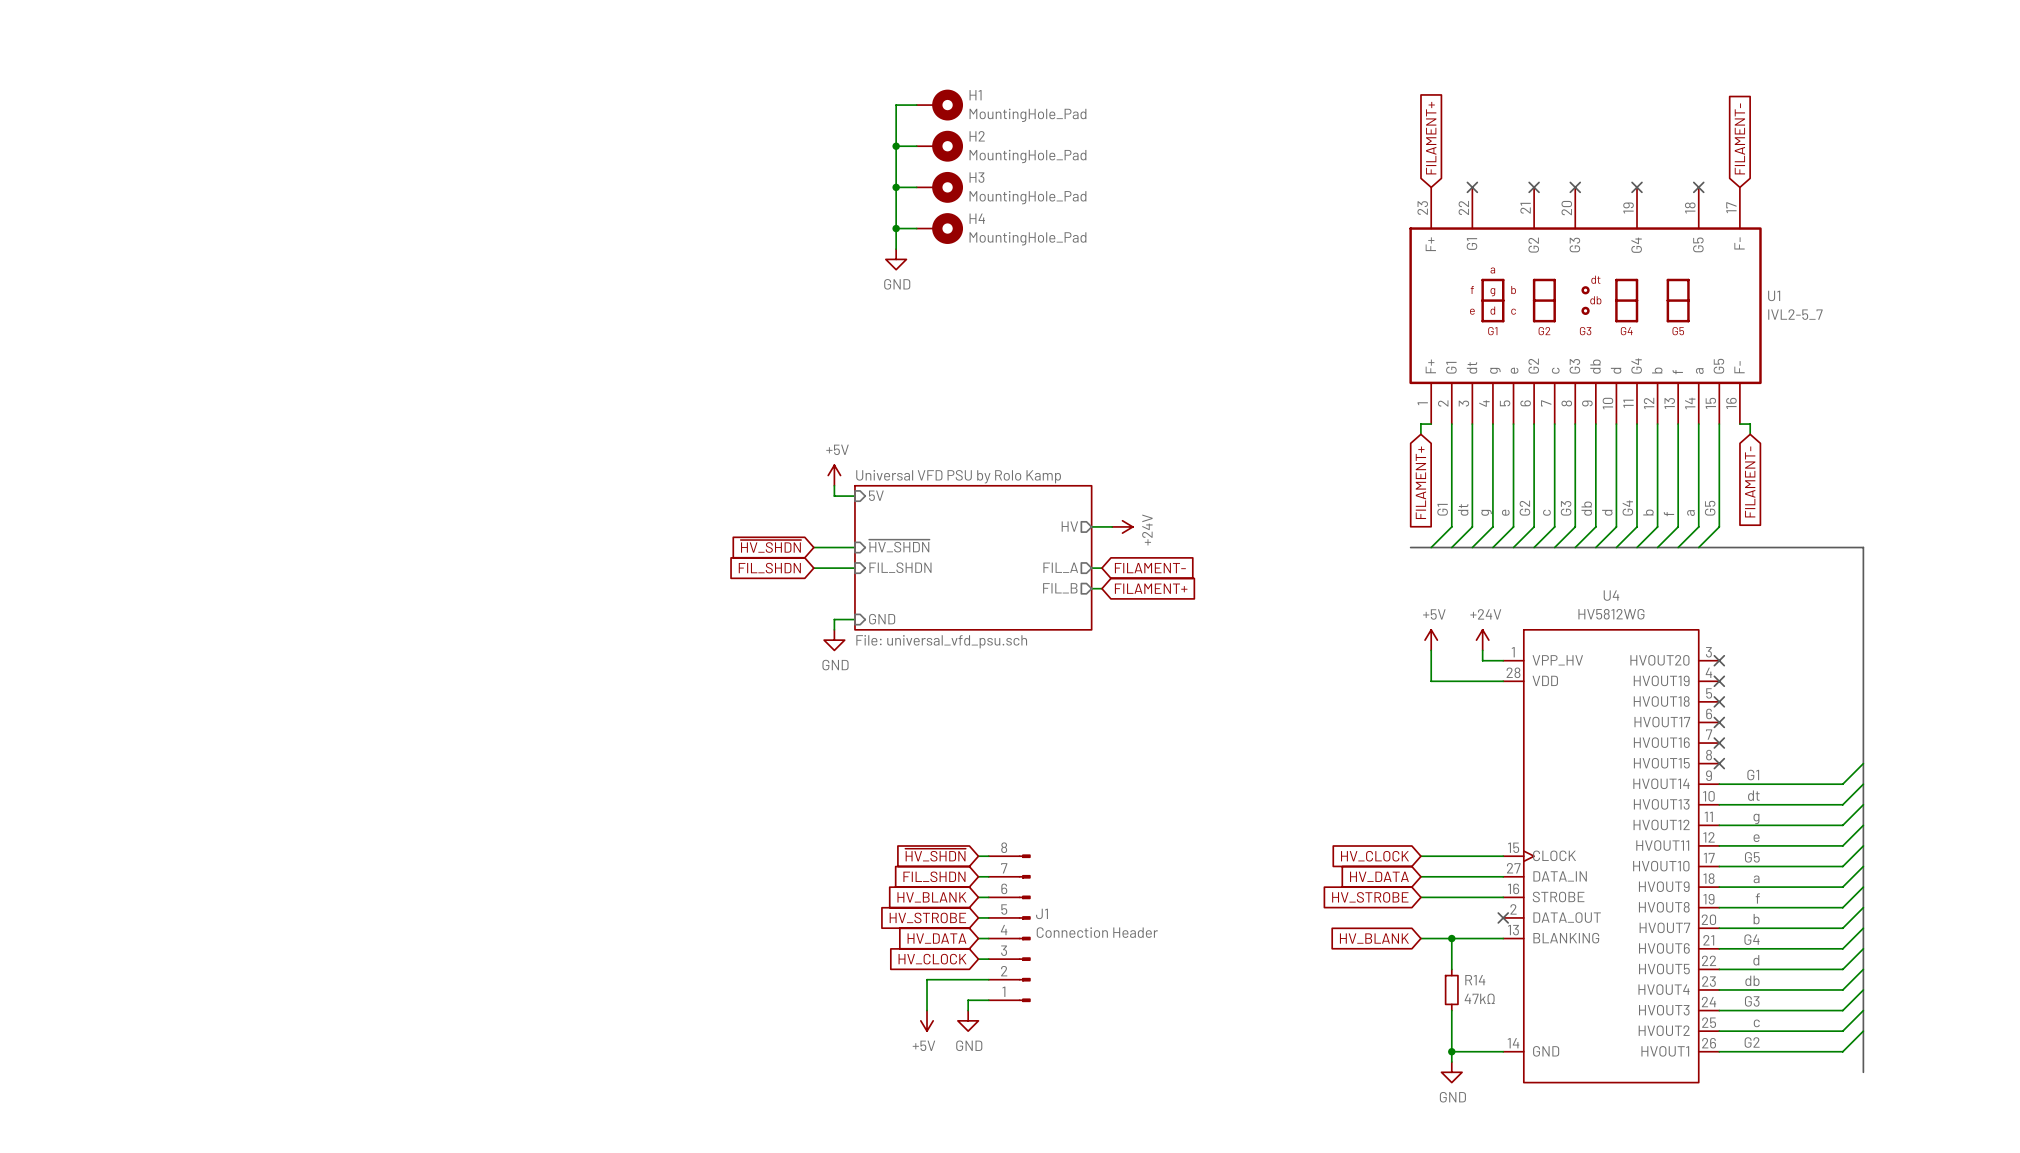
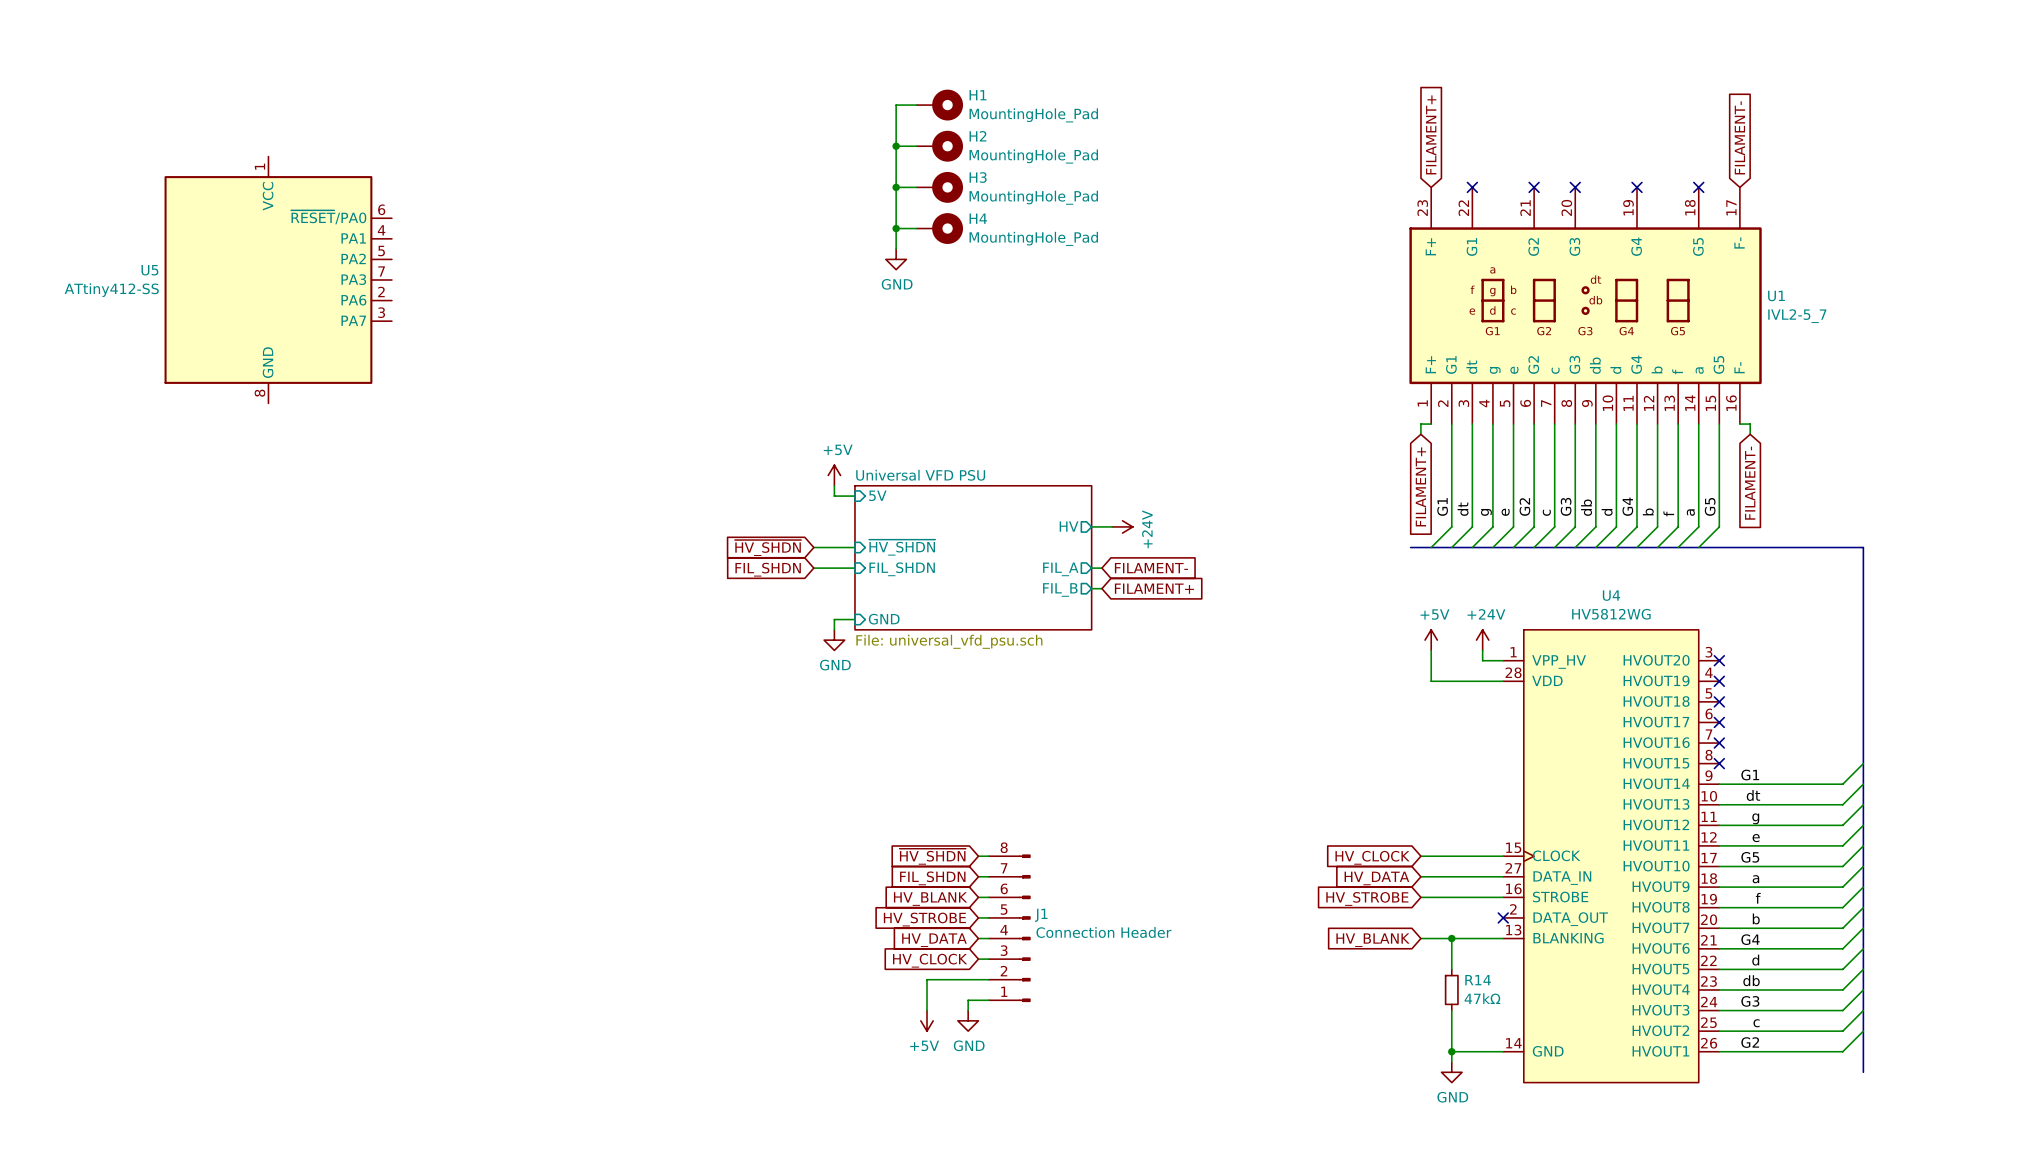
U5: none -> ATtiny412-SS (278, 279)
sheet Universal VFD PSU by Rolo Kamp name: Universal VFD PSU by Rolo Kamp (958, 476) -> Universal VFD PSU (920, 475)

